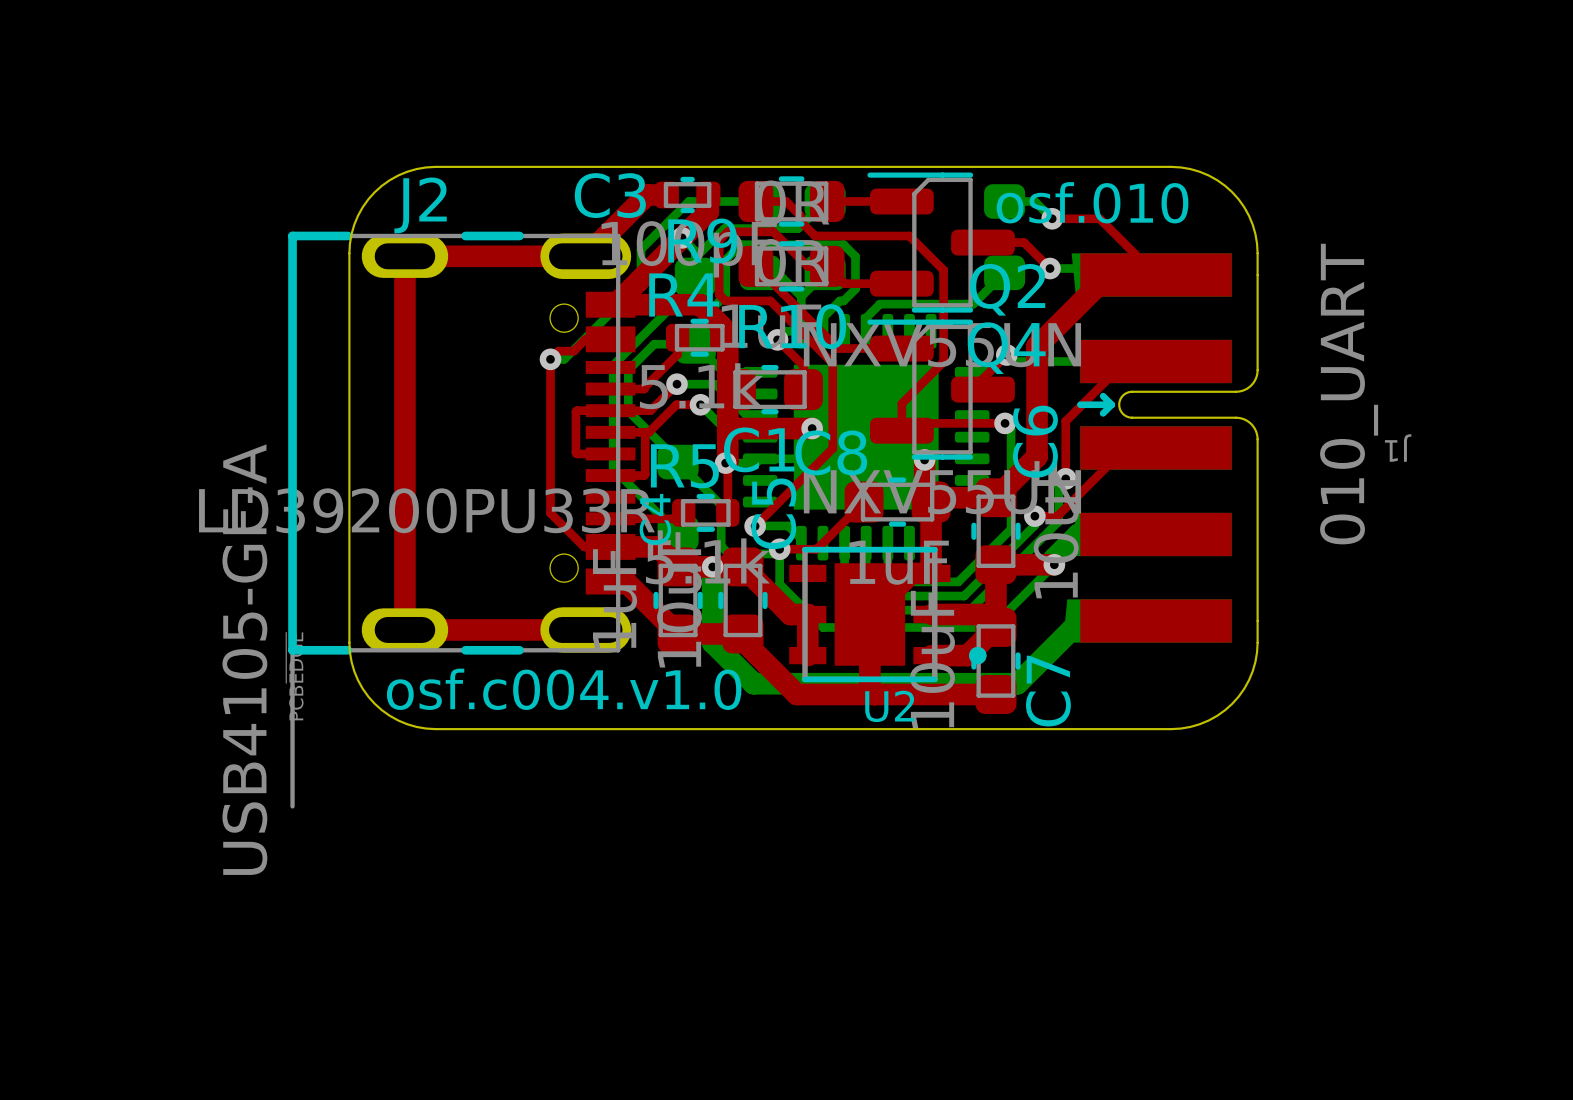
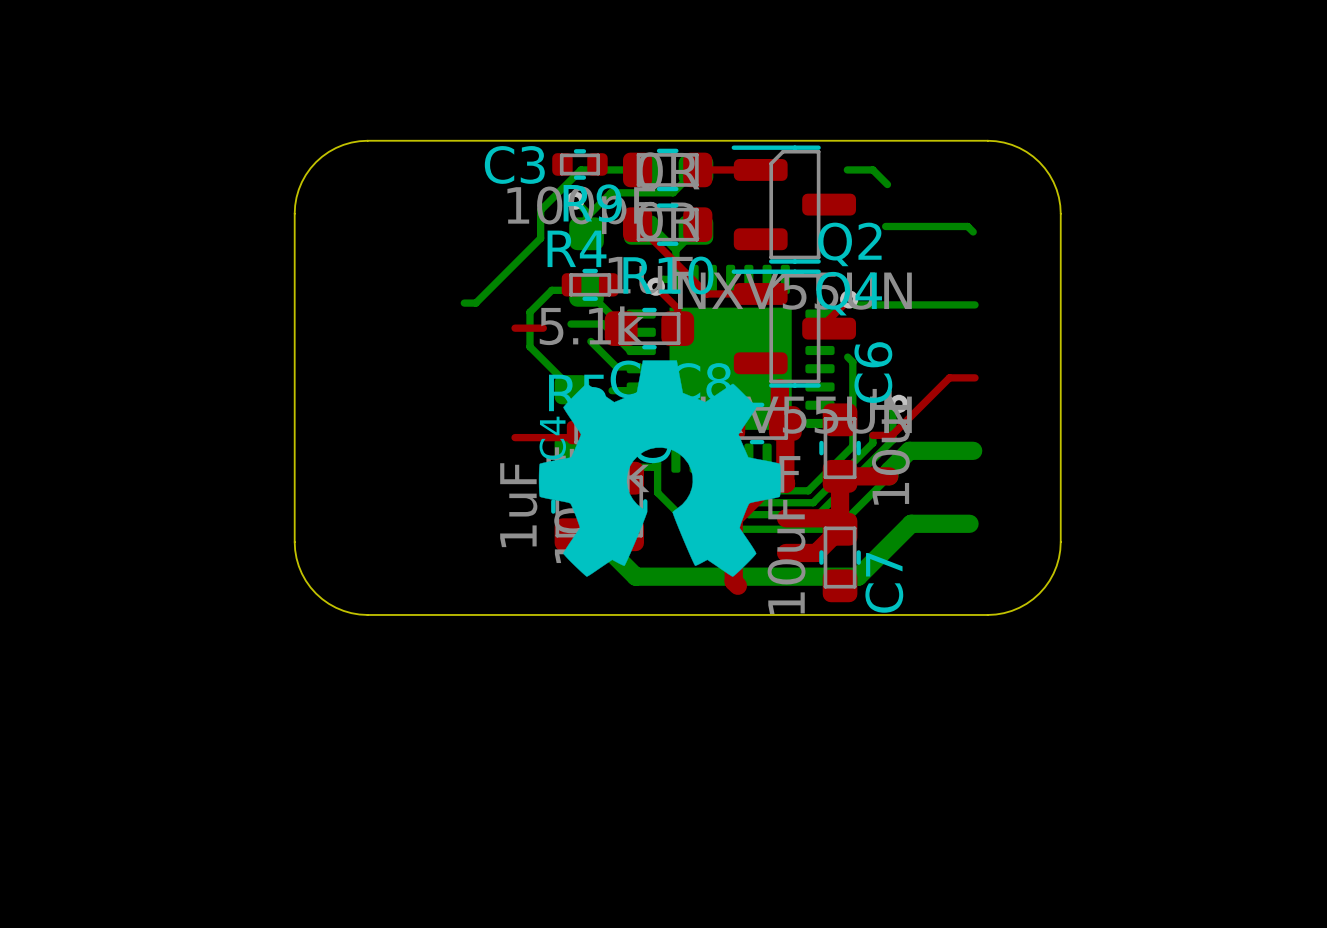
top track: (666, 195) (647, 195) (585, 256) (404, 256) (404, 629) (585, 629) -> none
top track: (708, 195) (708, 211) (615, 304) -> none
top track: (755, 201) (786, 201) (800, 215) (800, 221) (815, 236) (909, 236) (943, 270) (943, 361) (901, 403) (901, 430) (909, 423) (1005, 423) -> none
text: osf.010 (1092, 202) -> none
top track: (1052, 218) (1099, 218) (1155, 275) (1108, 275) (1037, 346) (1037, 456) (995, 497) (935, 497) (931, 502) -> none
via: (1052, 218) -> none
part: (1004, 237) -> none
top track: (982, 242) (1024, 242) (1050, 268) -> none
via: (1050, 268) -> none
bottom track: (1004, 272) (973, 304) (879, 304) (866, 317) (866, 331) -> none
board edge: none -> (1060, 231) (1060, 523)
top track: (901, 283) (844, 283) (827, 266) (807, 266) (773, 231) (727, 231) (719, 240) (719, 294) (725, 300) (770, 300) (832, 363) (832, 448) (755, 526) -> none
top track: (610, 304) (700, 304) (721, 326) (721, 337) (727, 343) (727, 460) (725, 463) (727, 465) (727, 512) -> none
bottom track: (822, 331) (822, 317) (855, 289) (855, 256) (843, 244) (740, 244) (725, 259) (725, 295) (711, 309) (668, 309) (613, 365) (613, 468) (678, 533) -> none
top track: (677, 337) (677, 354) (644, 388) -> none
top track: (610, 339) (585, 339) (573, 351) (558, 351) (550, 359) (550, 513) (584, 546) (658, 546) (678, 566) (742, 566) (790, 614) (807, 614) (807, 655) -> none
via: (550, 359) -> none
top track: (1155, 361) (1125, 361) (1065, 421) (1065, 478) -> none
top track: (676, 384) (650, 410) (575, 411) (575, 452) (610, 453) -> none
via: (676, 384) -> none
top track: (700, 404) (676, 404) (648, 432) (610, 432) -> none
via: (700, 404) -> none
via: (1005, 423) -> none
drawing: none -> [538, 360, 781, 577]
top track: (727, 428) (812, 428) -> none
via: (812, 428) -> none
top track: (644, 432) (645, 474) (610, 475) -> none
J1: 010_UART (1160, 448) -> none
via: (924, 459) -> none
via: (725, 463) -> none
top track: (864, 502) (816, 549) (779, 549) -> none
via: (1034, 516) -> none
J2: USB4105-GF-A (461, 520) -> none
bottom track: (755, 525) (788, 525) (801, 539) (801, 543) -> none
via: (755, 526) -> none
via: (779, 549) -> none
via: (1054, 564) -> none
via: (712, 566) -> none
top track: (610, 581) (625, 581) (678, 633) (742, 633) (742, 640) (796, 694) (995, 694) -> none
U2: LD39200PU33R (887, 614) -> none
text: osf.c004.v1.0 (564, 689) -> none

